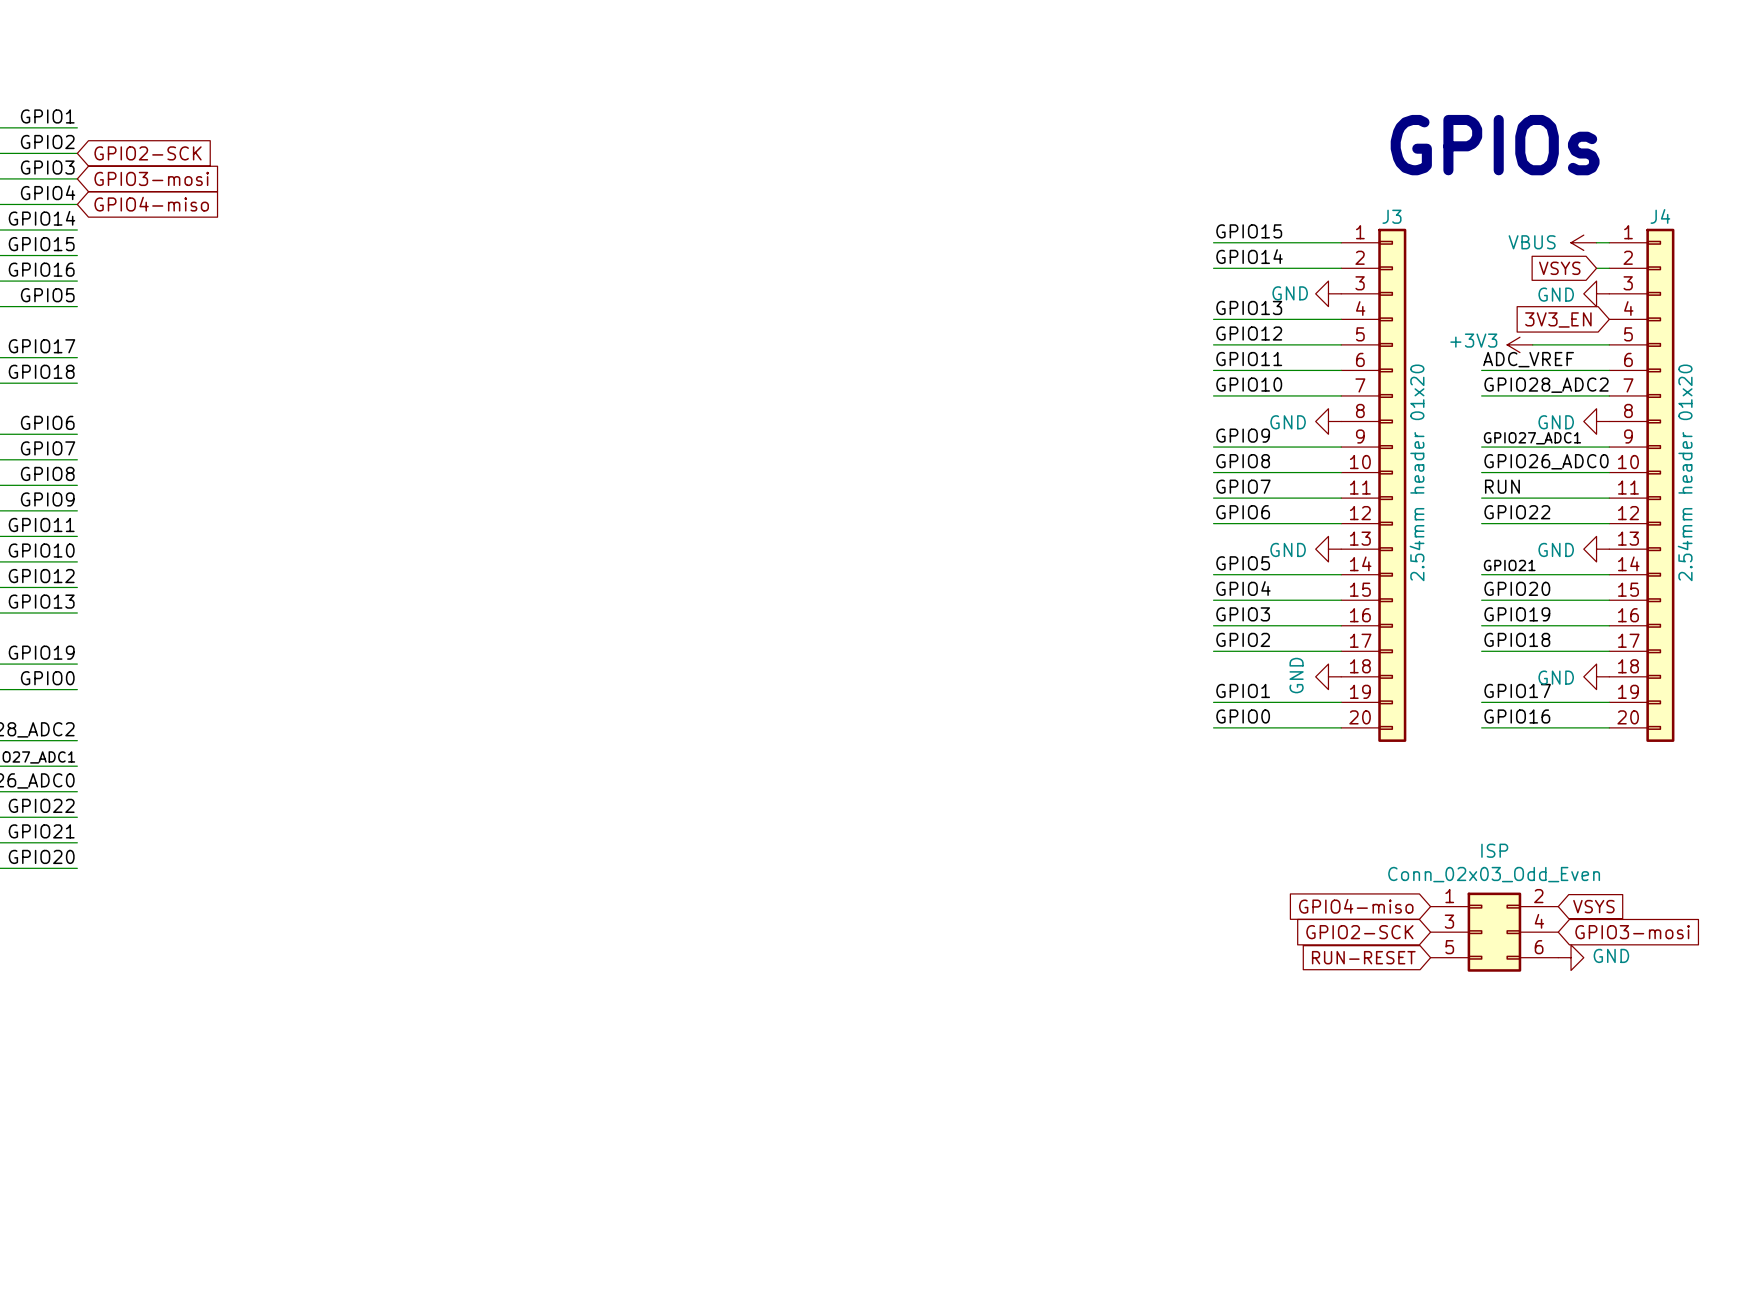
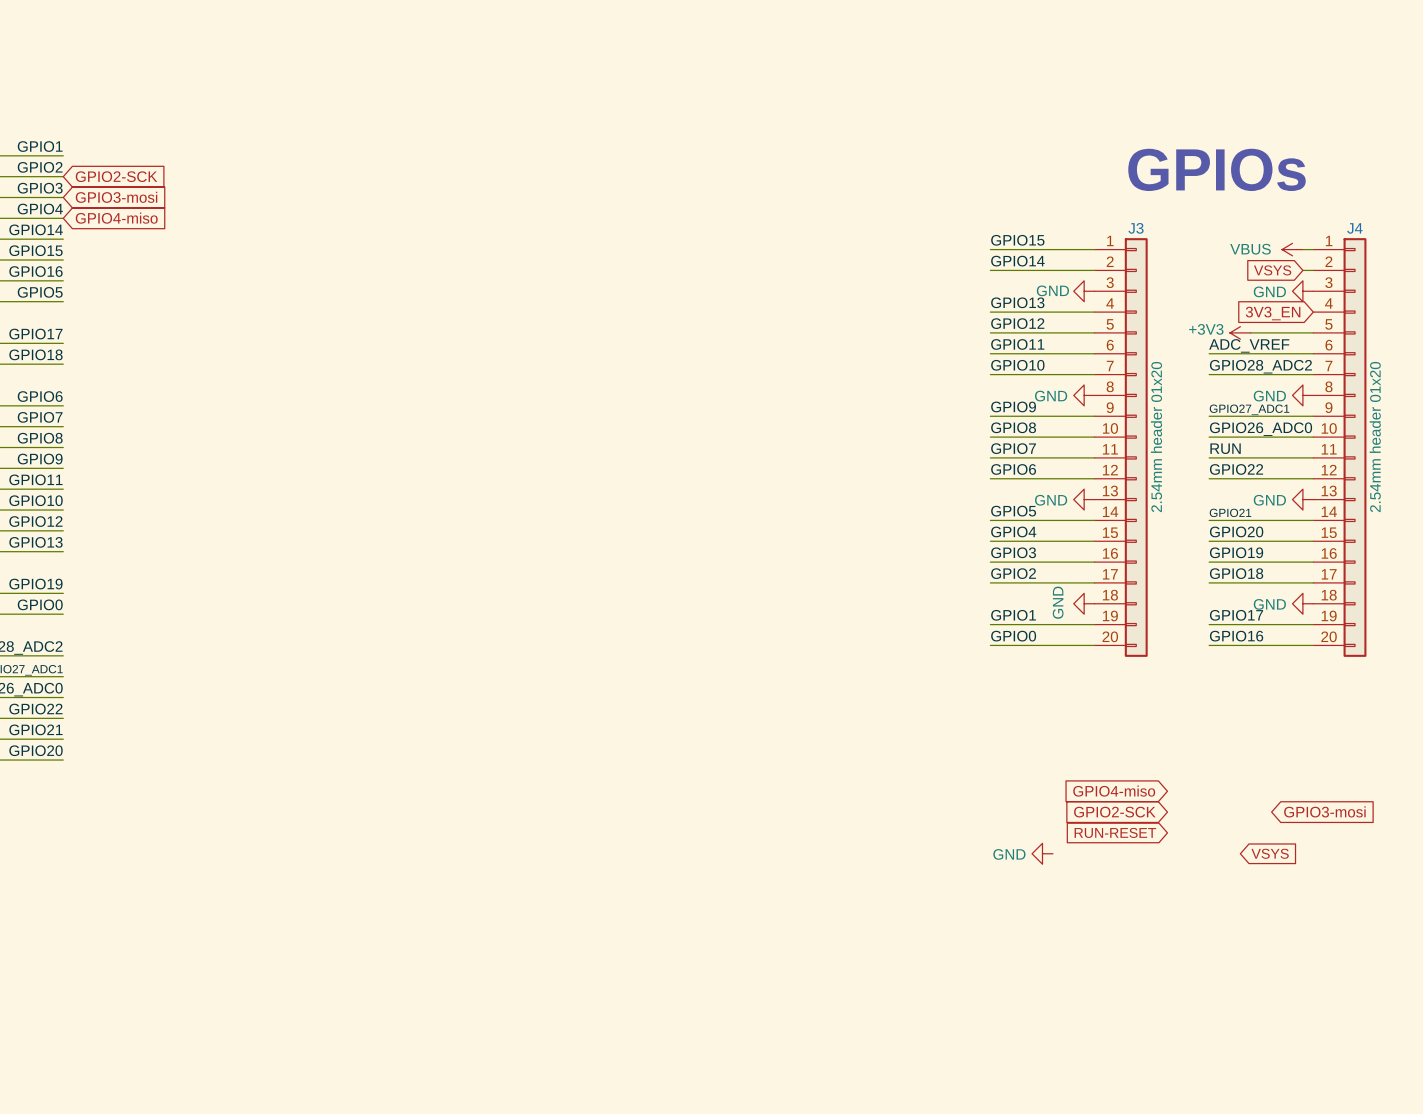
global label position: VSYS (1593, 906) -> VSYS (1270, 853)
ISP: Conn_02x03_Odd_Even (1494, 932) -> none
power symbol: GND (1571, 957) -> none
power symbol: none -> GND (1042, 853)

